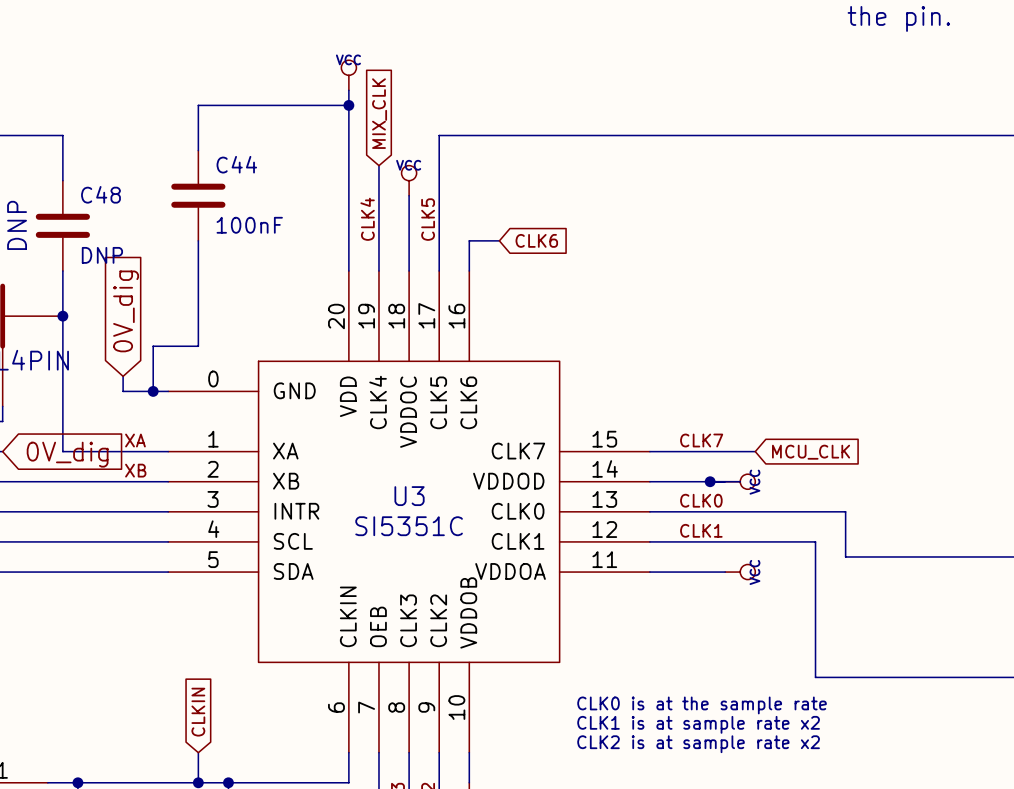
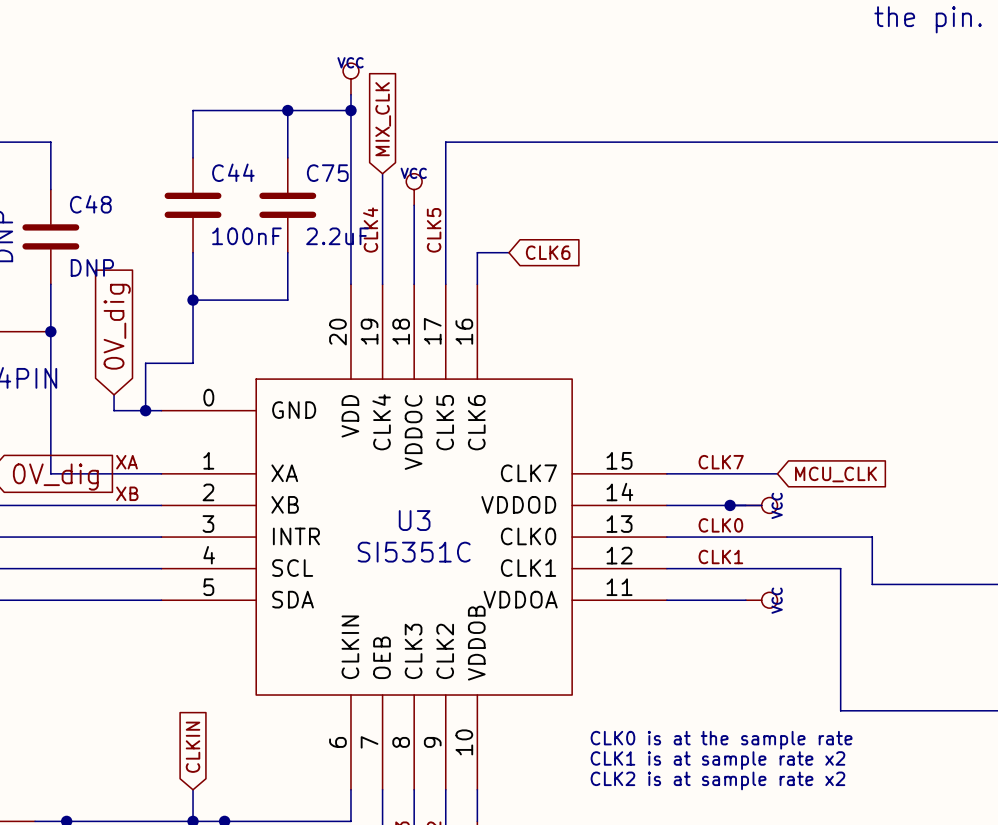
wire: none -> (287, 110) (287, 157)
junction: none -> (287, 110)
C75: none -> 2.2uF (287, 205)
wire: none -> (287, 252) (287, 300) (193, 300)
junction: none -> (193, 300)

